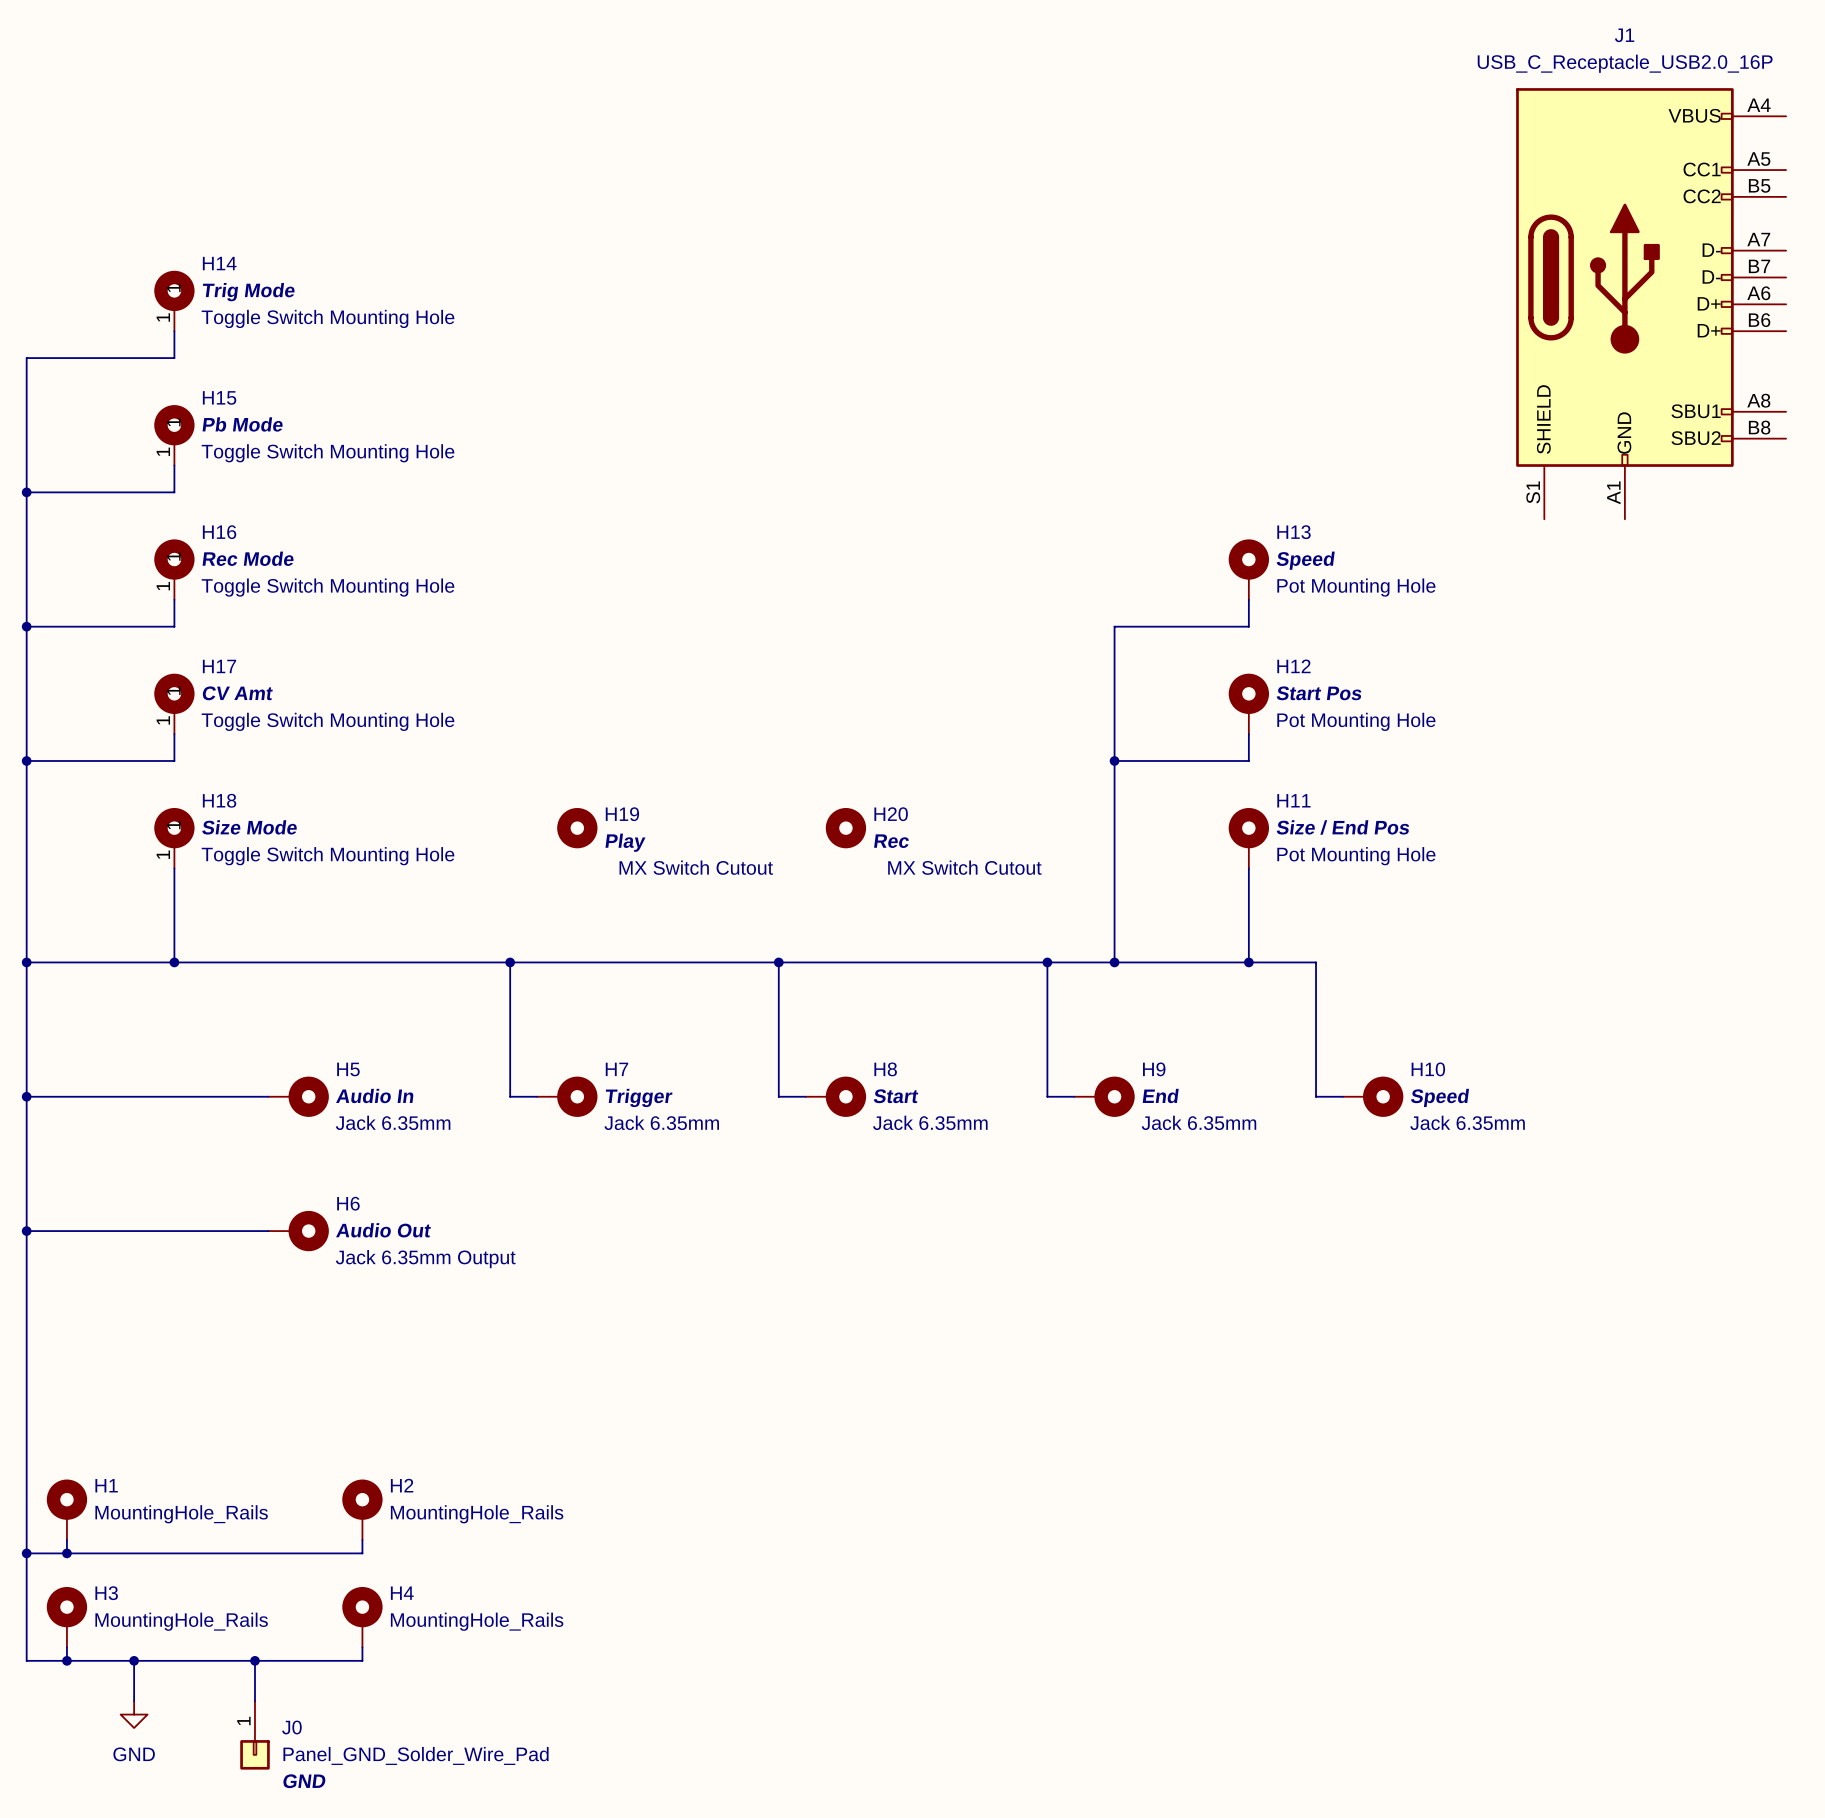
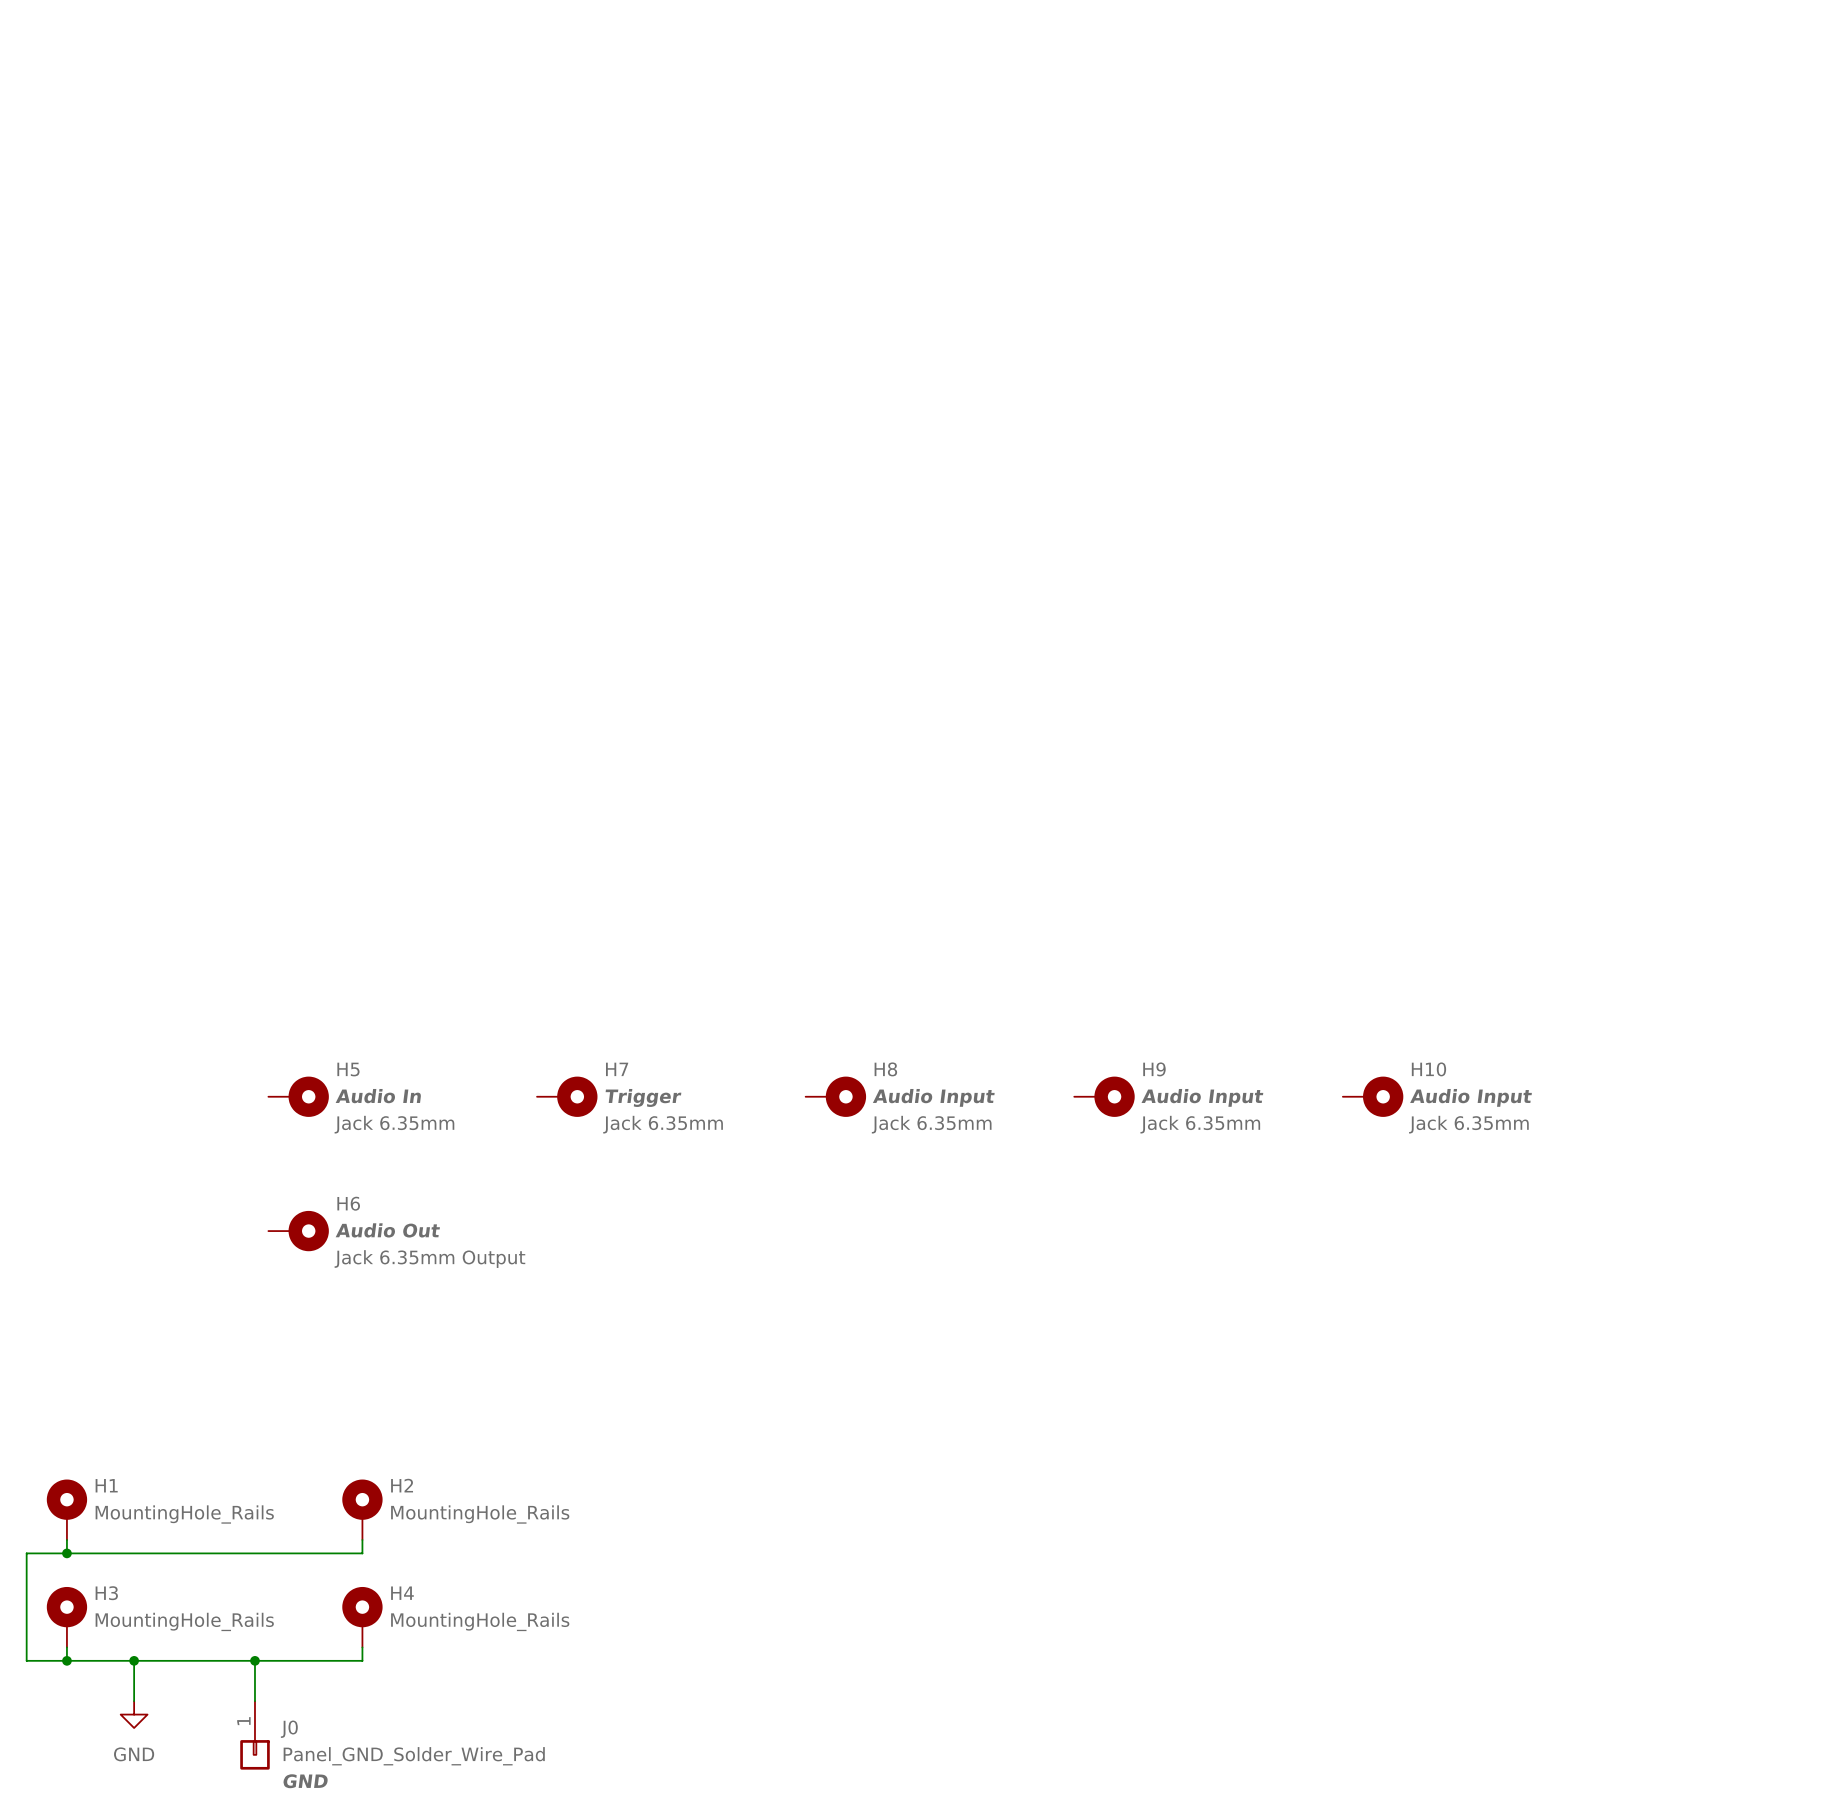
H14: Trig Mode (174, 300) -> none
J1: USB_C_Receptacle_USB2.0_16P (1651, 303) -> none
wire: (174, 331) (174, 358) (26, 358) (26, 1553) -> none
H15: Pb Mode (174, 435) -> none
wire: (174, 465) (174, 492) (26, 492) -> none
junction: (26, 492) -> none
H16: Rec Mode (174, 569) -> none
H13: Speed (1248, 569) -> none
wire: (174, 599) (174, 626) (26, 626) -> none
wire: (1248, 599) (1248, 626) (1114, 626) (1114, 962) -> none
junction: (26, 626) -> none
H17: CV Amt (174, 703) -> none
H12: Start Pos (1248, 703) -> none
wire: (174, 734) (174, 760) (26, 760) -> none
wire: (1248, 734) (1248, 760) (1114, 760) -> none
junction: (26, 760) -> none
junction: (1114, 760) -> none
H19: Play (577, 828) -> none
H20: Rec (845, 828) -> none
H18: Size Mode (174, 838) -> none
H11: Size / End Pos (1248, 838) -> none
wire: (174, 868) (174, 962) -> none
wire: (1248, 868) (1248, 962) -> none
wire: (26, 962) (1316, 962) (1316, 1096) (1342, 1096) -> none
junction: (26, 962) -> none
junction: (174, 962) -> none
wire: (510, 962) (510, 1096) (537, 1096) -> none
junction: (510, 962) -> none
wire: (778, 962) (778, 1096) (805, 1096) -> none
junction: (778, 962) -> none
wire: (1047, 962) (1047, 1096) (1074, 1096) -> none
junction: (1047, 962) -> none
junction: (1114, 962) -> none
junction: (1248, 962) -> none
H9 value: End (1160, 1095) -> Audio Input (1202, 1097)
wire: (26, 1096) (268, 1096) -> none
junction: (26, 1096) -> none
H8 value: Start (896, 1096) -> Audio Input (933, 1097)
H10 value: Speed (1440, 1097) -> Audio Input (1471, 1097)
wire: (26, 1231) (268, 1231) -> none
junction: (26, 1231) -> none
junction: (26, 1553) -> none

